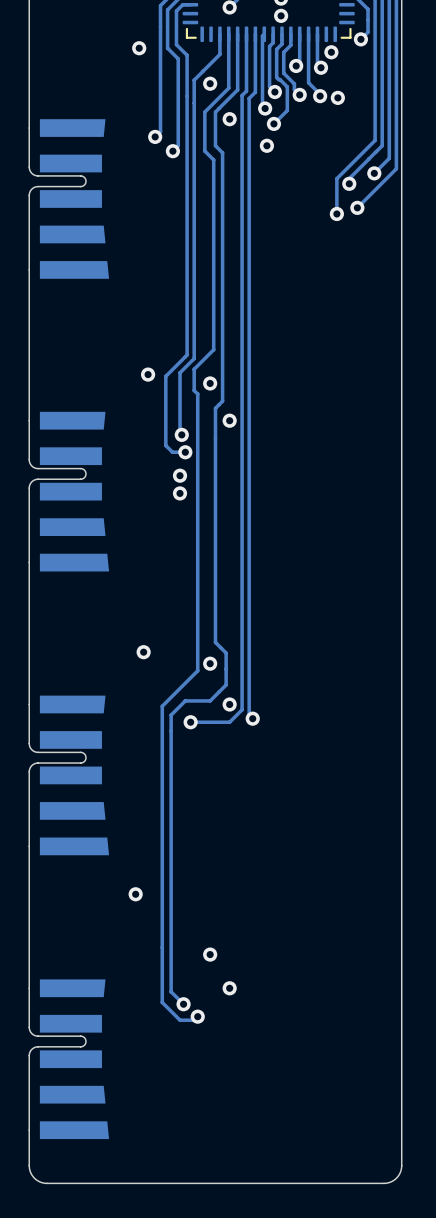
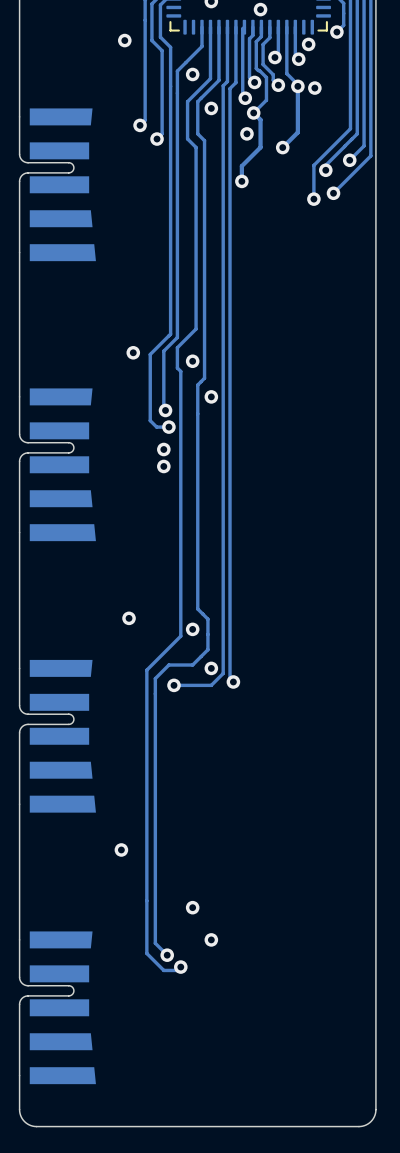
track: none -> (297, 86) (297, 132) (282, 147)
track: none -> (253, 112) (260, 119) (260, 147) (241, 166) (241, 181)
via: none -> (282, 147)
via: none -> (241, 181)

